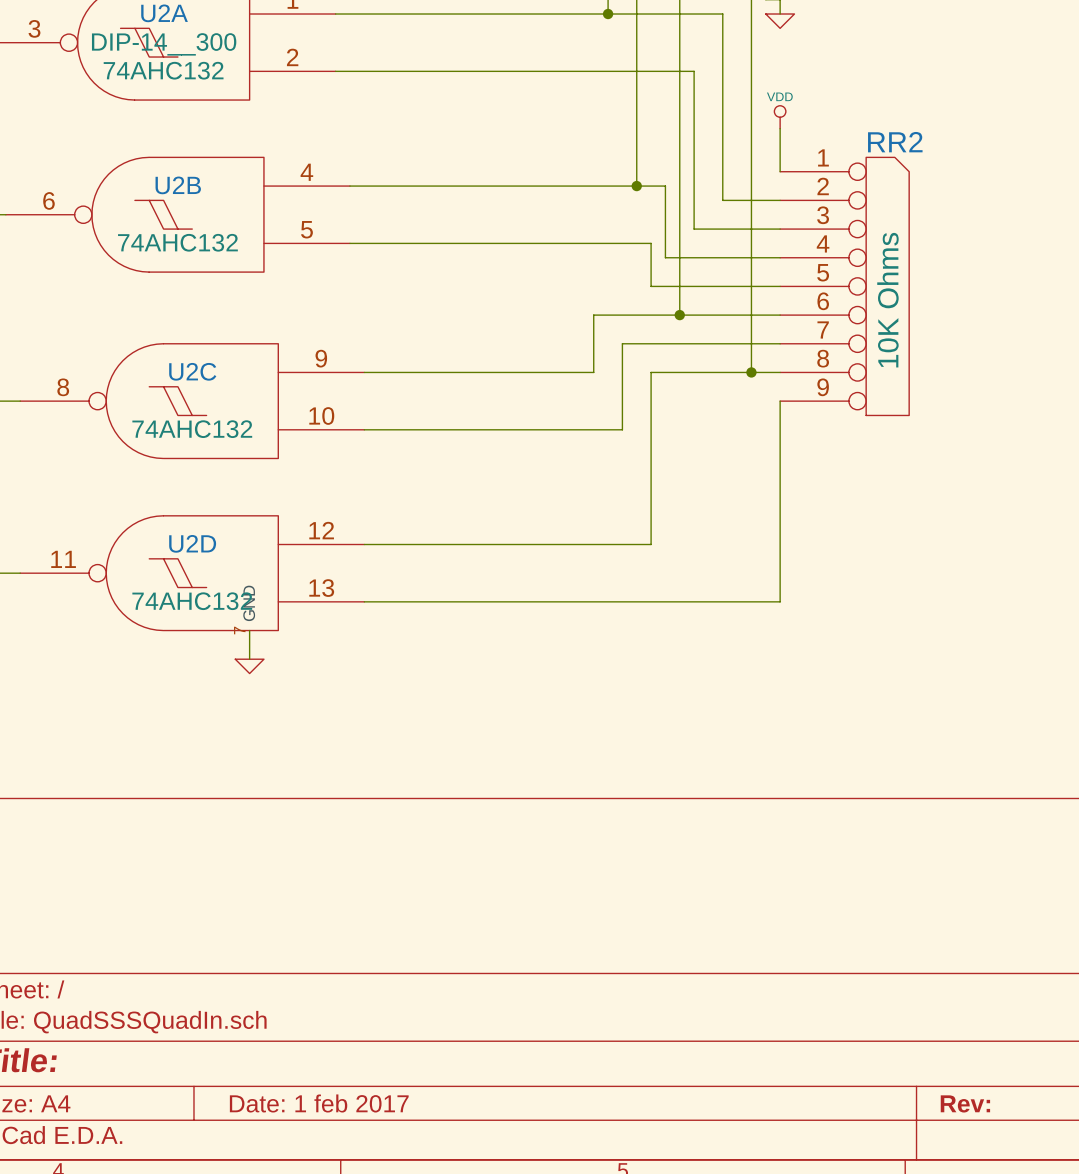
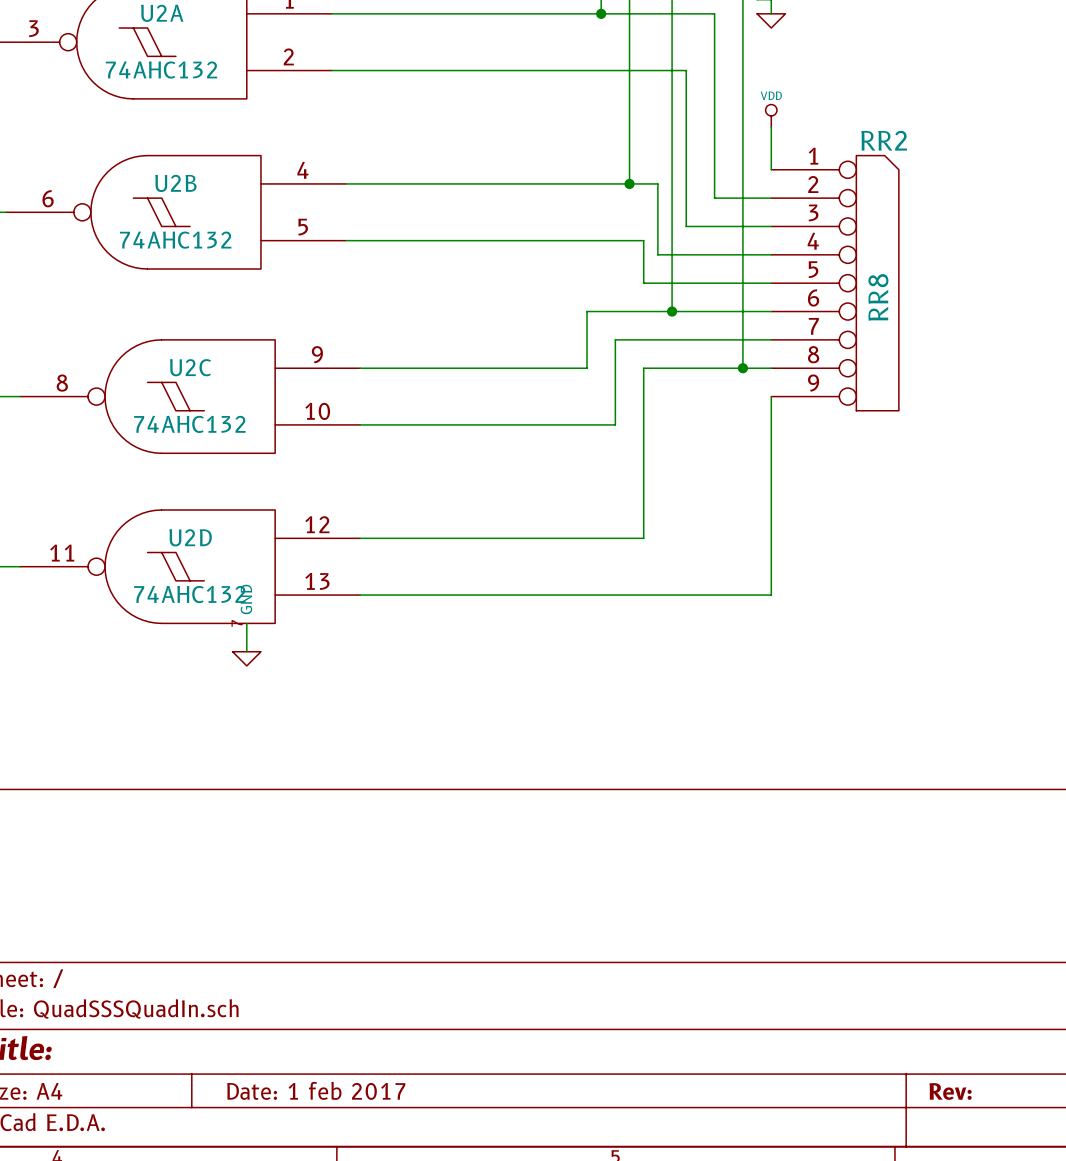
U2A text: DIP-14__300 (164, 44) -> none
RR2 value: 10K Ohms (887, 300) -> RR8 (878, 297)

